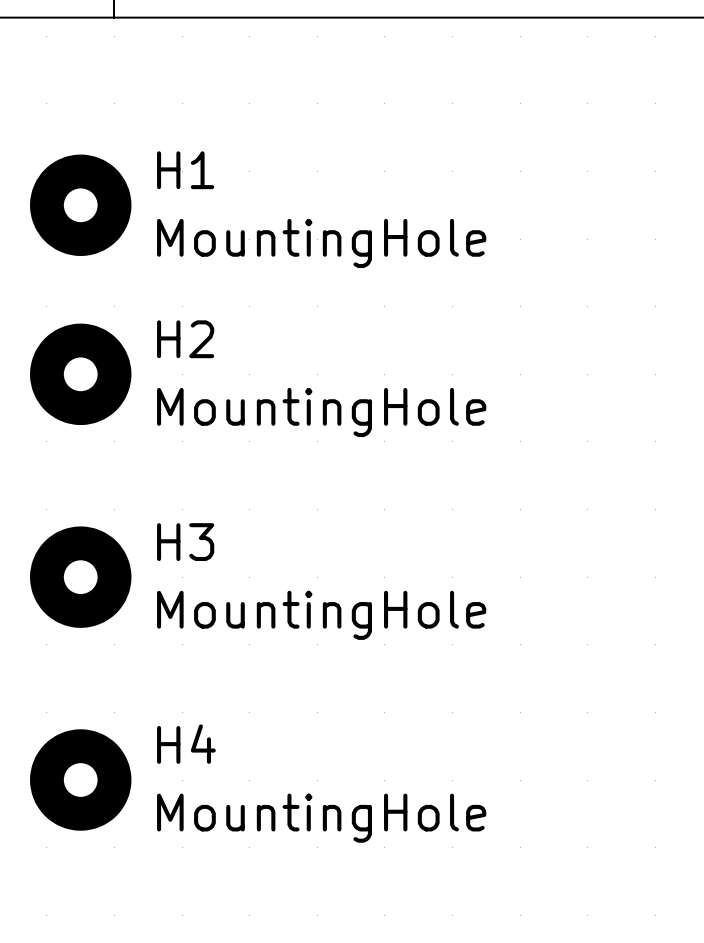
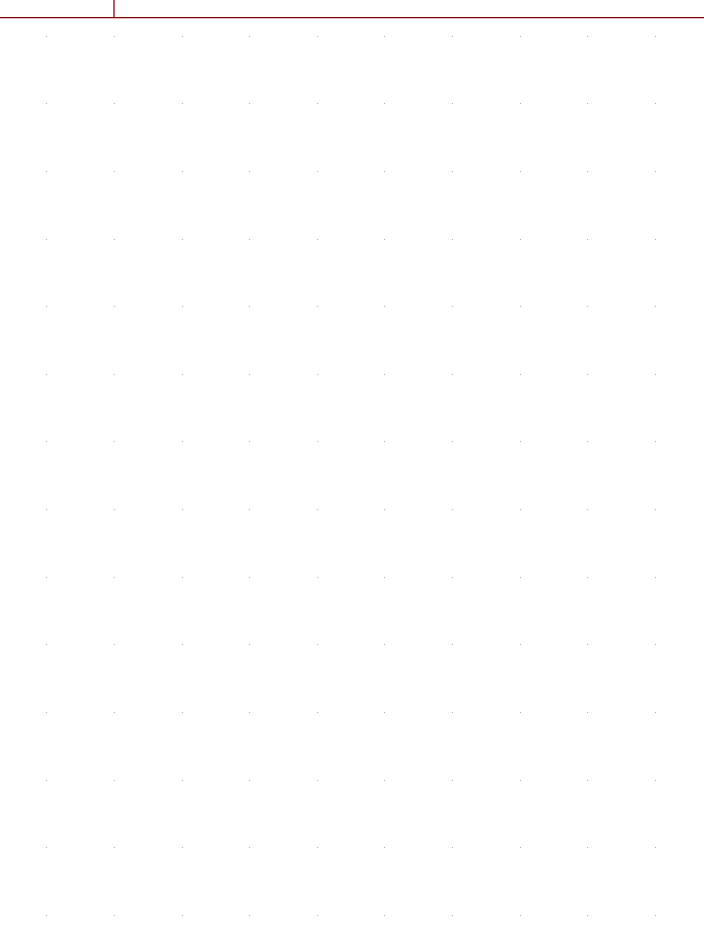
H1: MountingHole (80, 205) -> none
H2: MountingHole (80, 374) -> none
H3: MountingHole (80, 577) -> none
H4: MountingHole (80, 780) -> none

